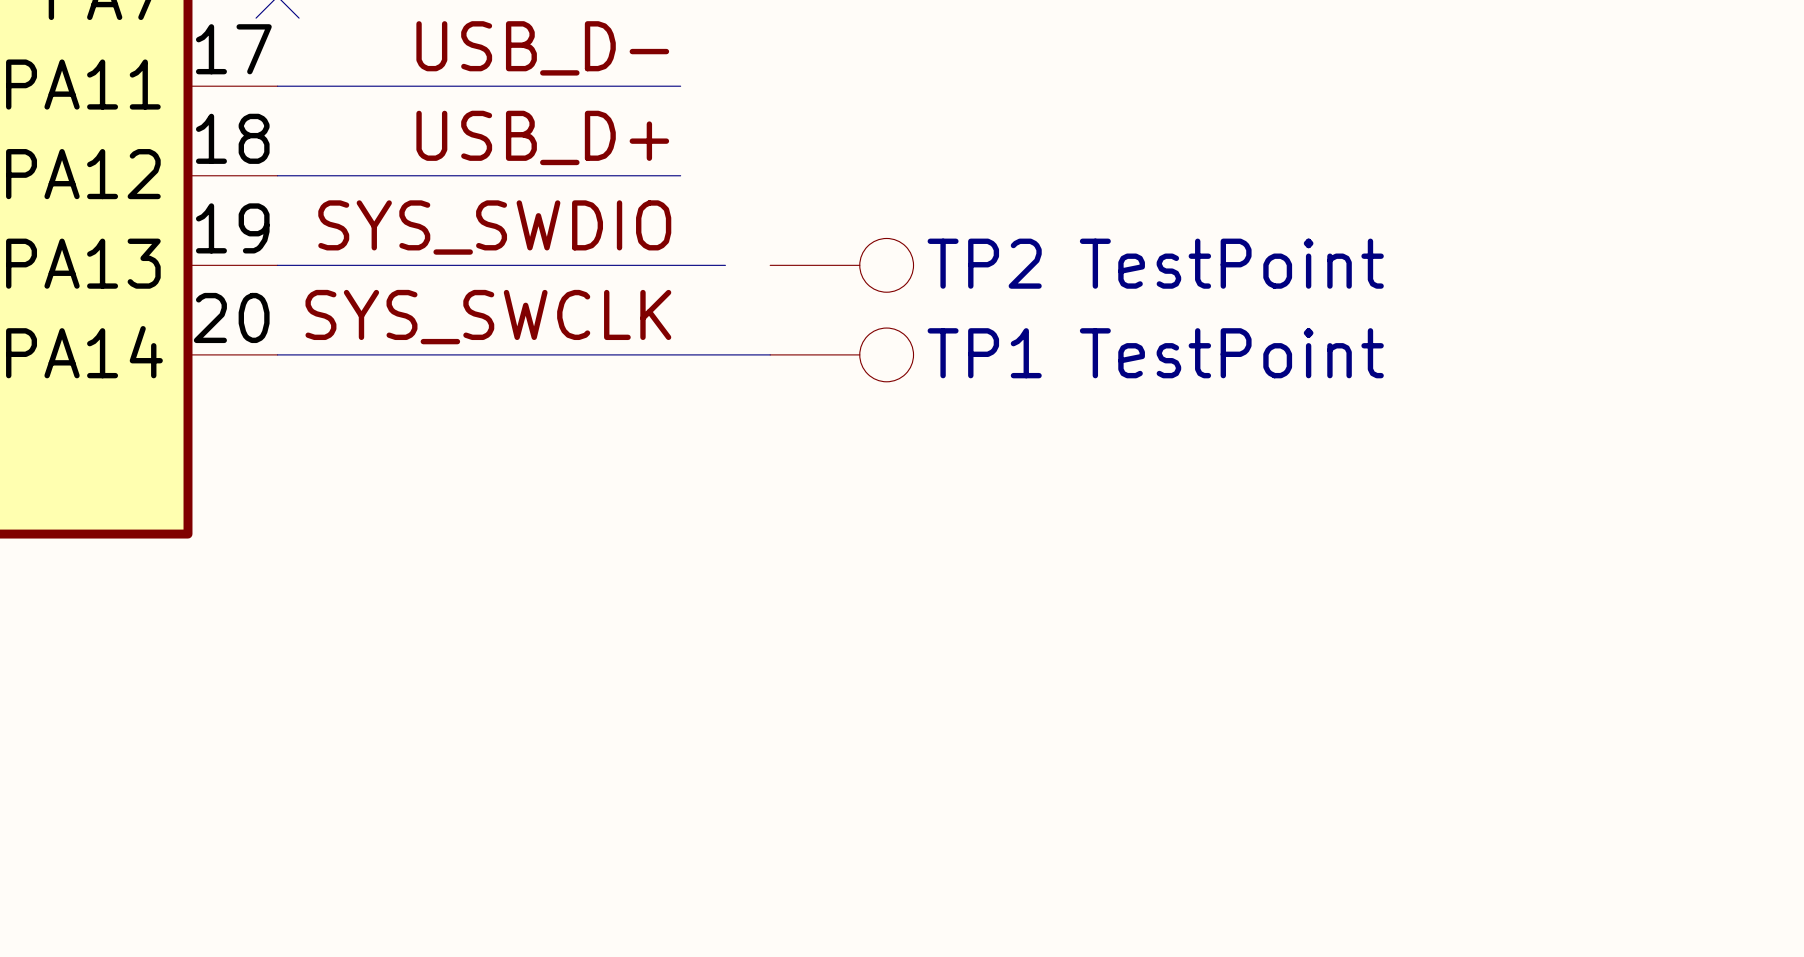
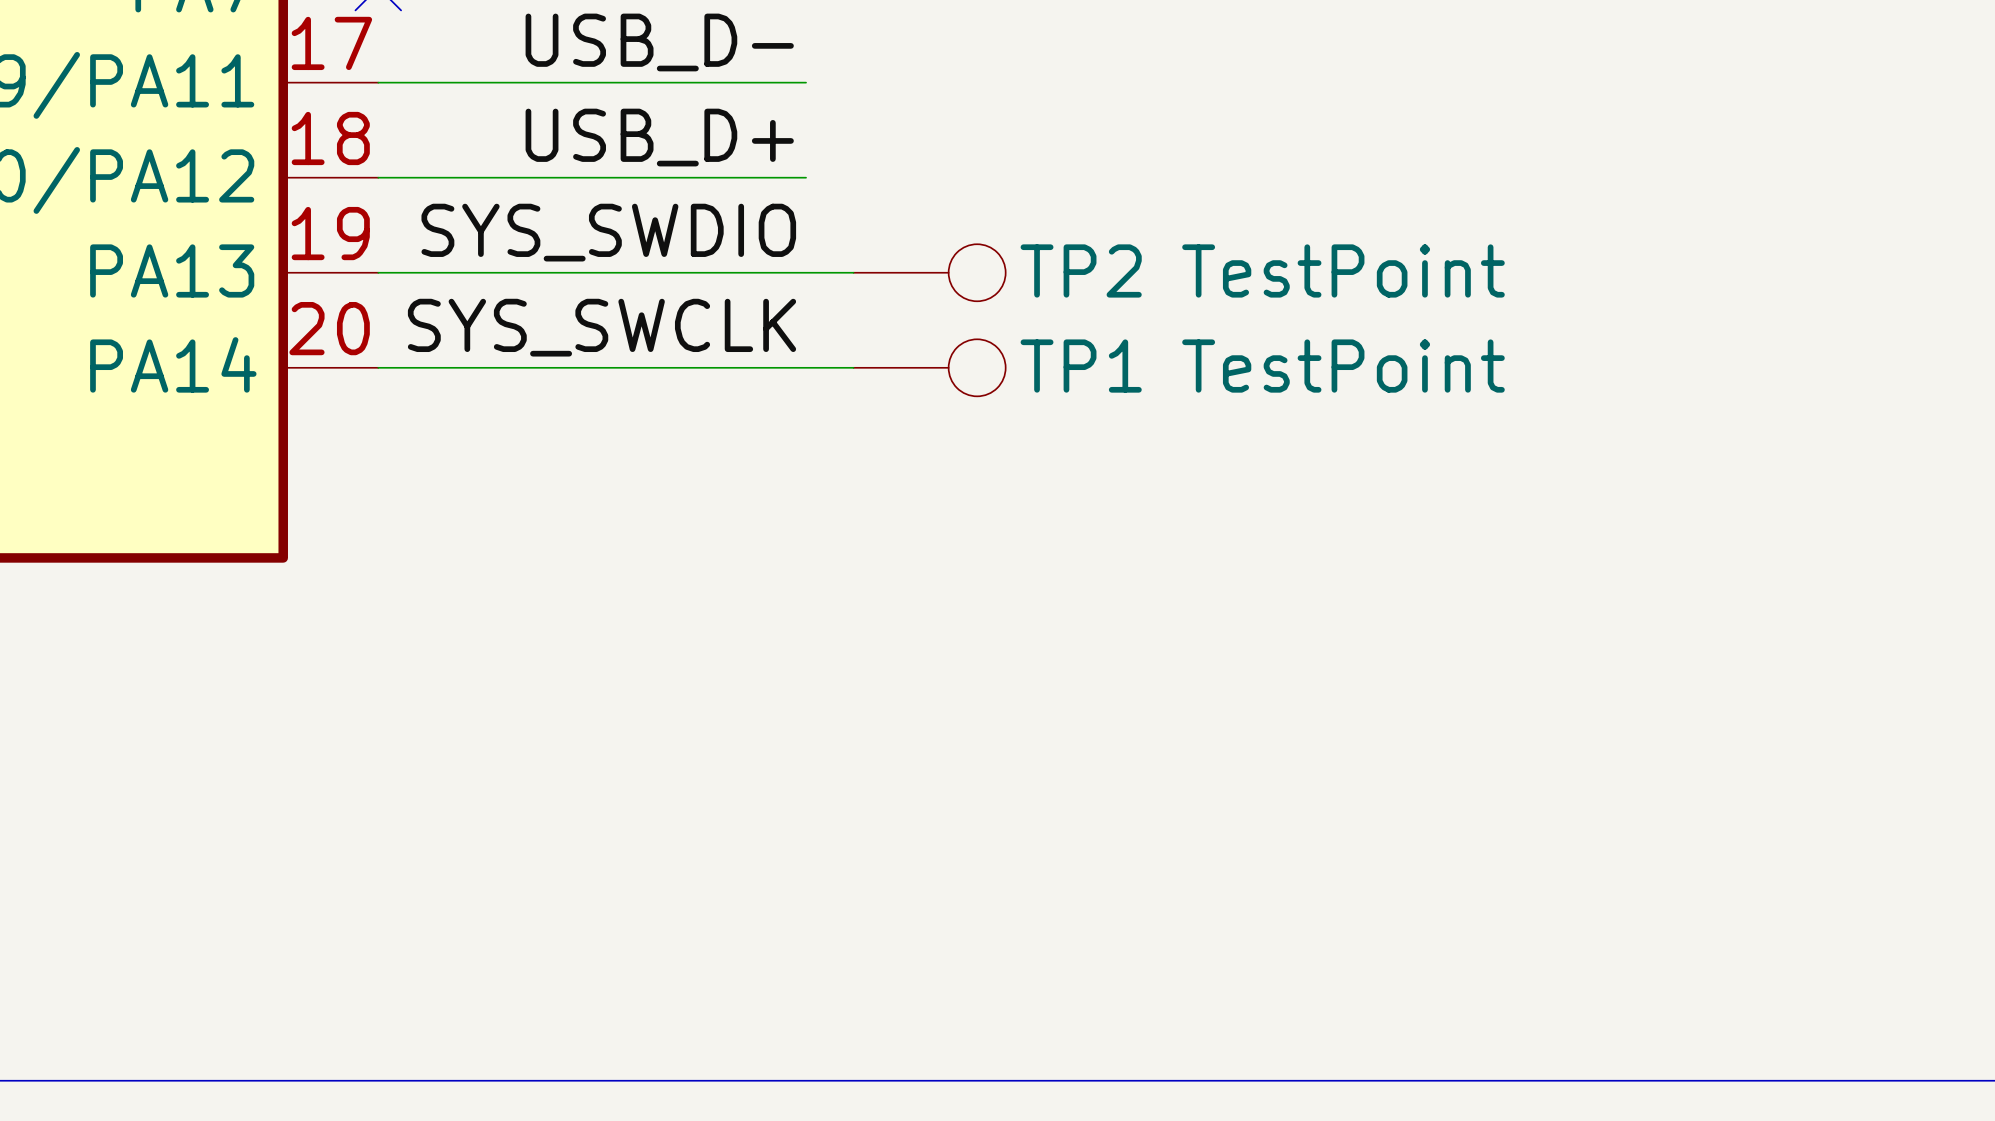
TP2 position: (841, 265) -> (929, 272)
TP1 position: (841, 354) -> (929, 367)

